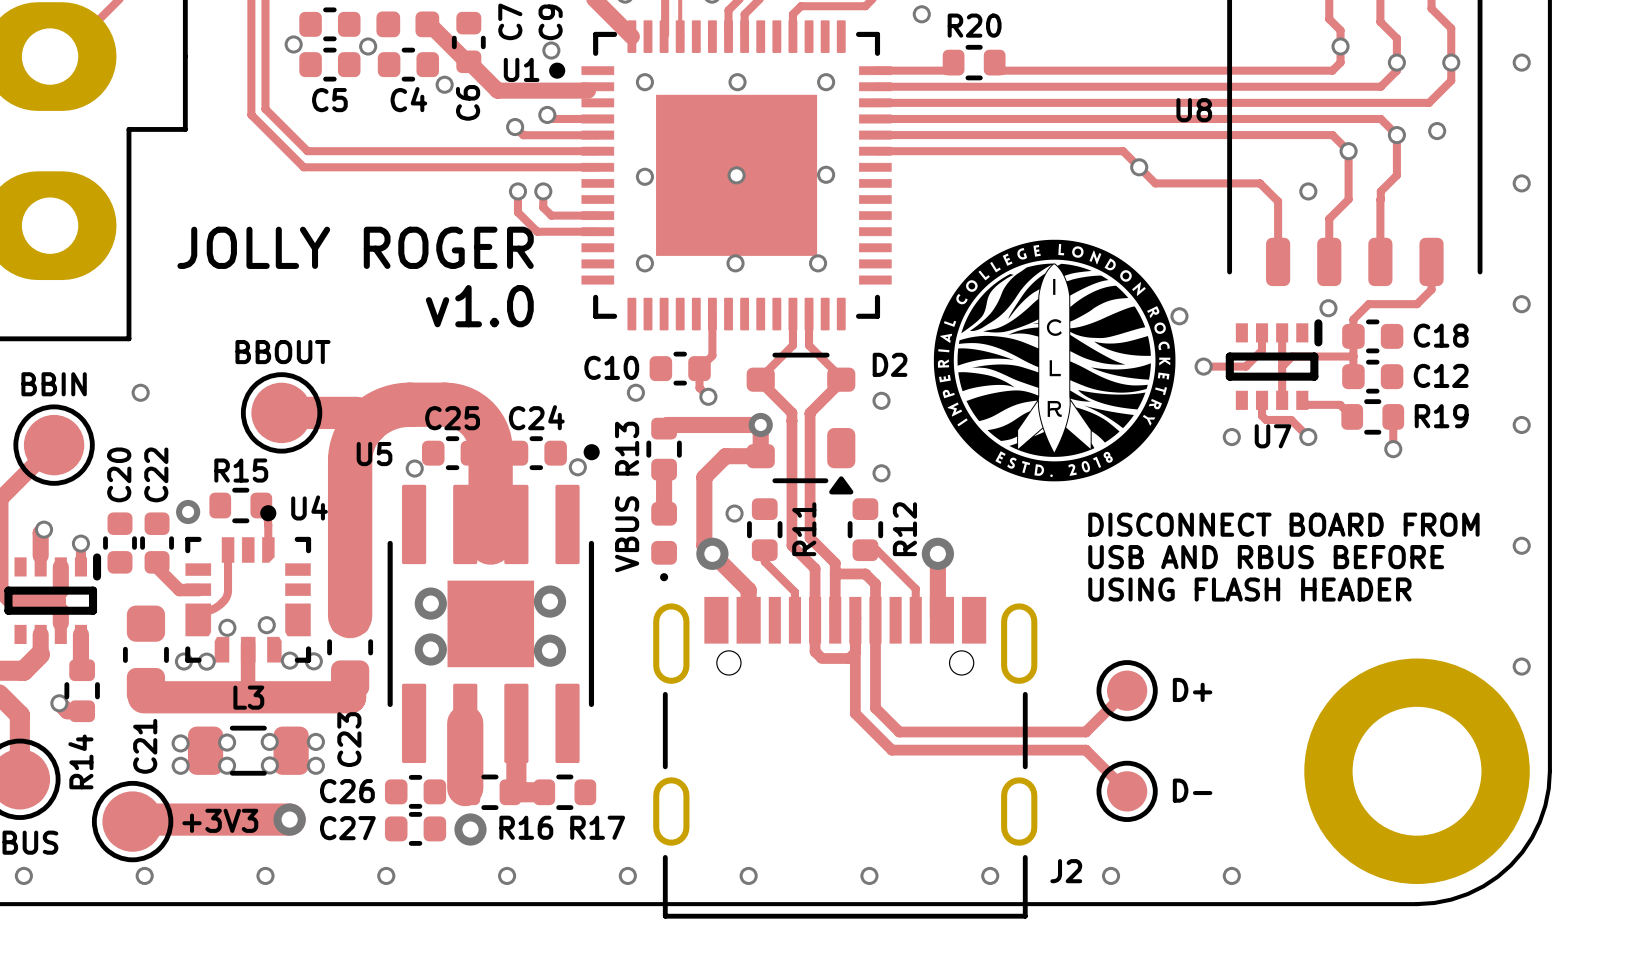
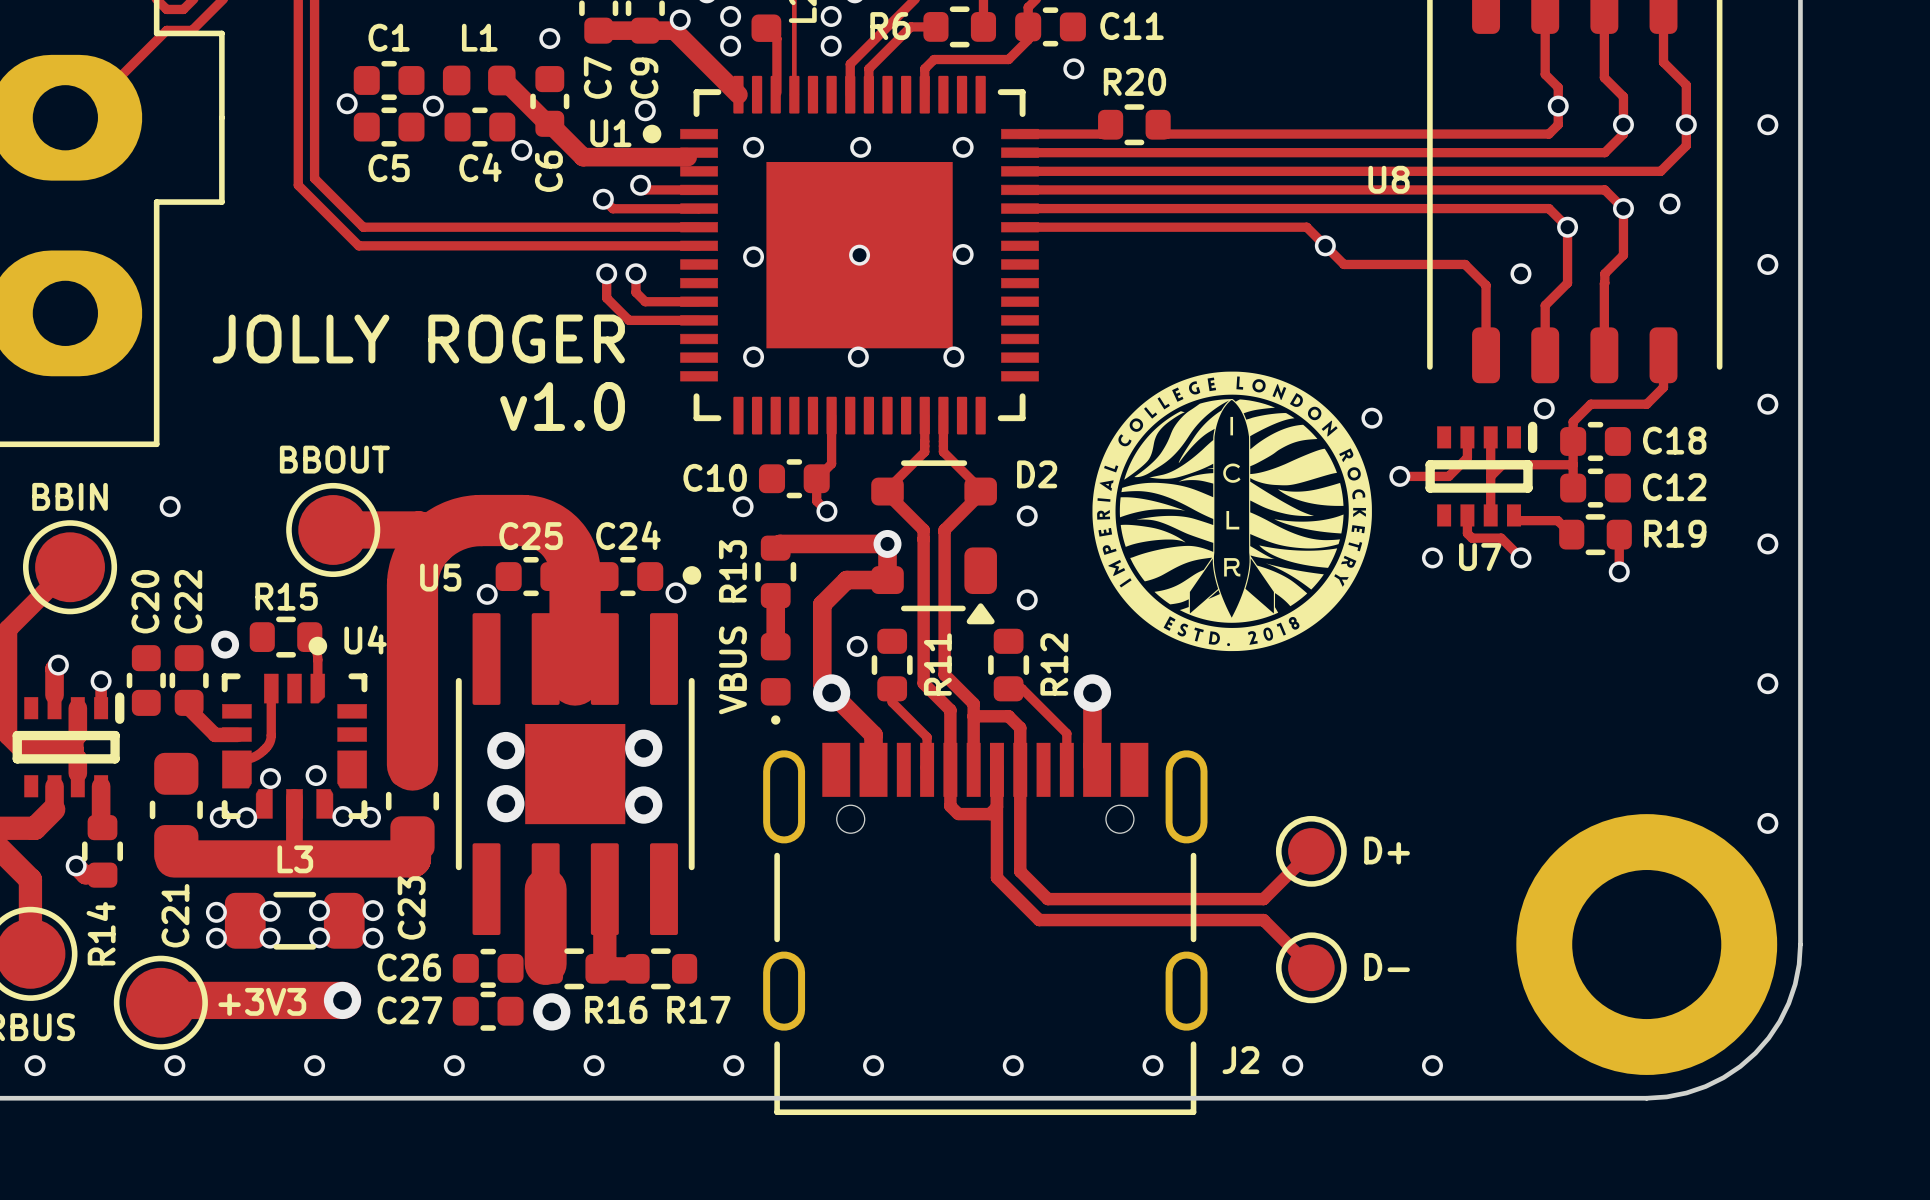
drawing position: (1054, 360) -> (1232, 511)
text: DISCONNECT BOARD FROM (1283, 524) -> none
text: USB AND RBUS BEFORE (1266, 557) -> none
text: USING FLASH HEADER (1249, 589) -> none

